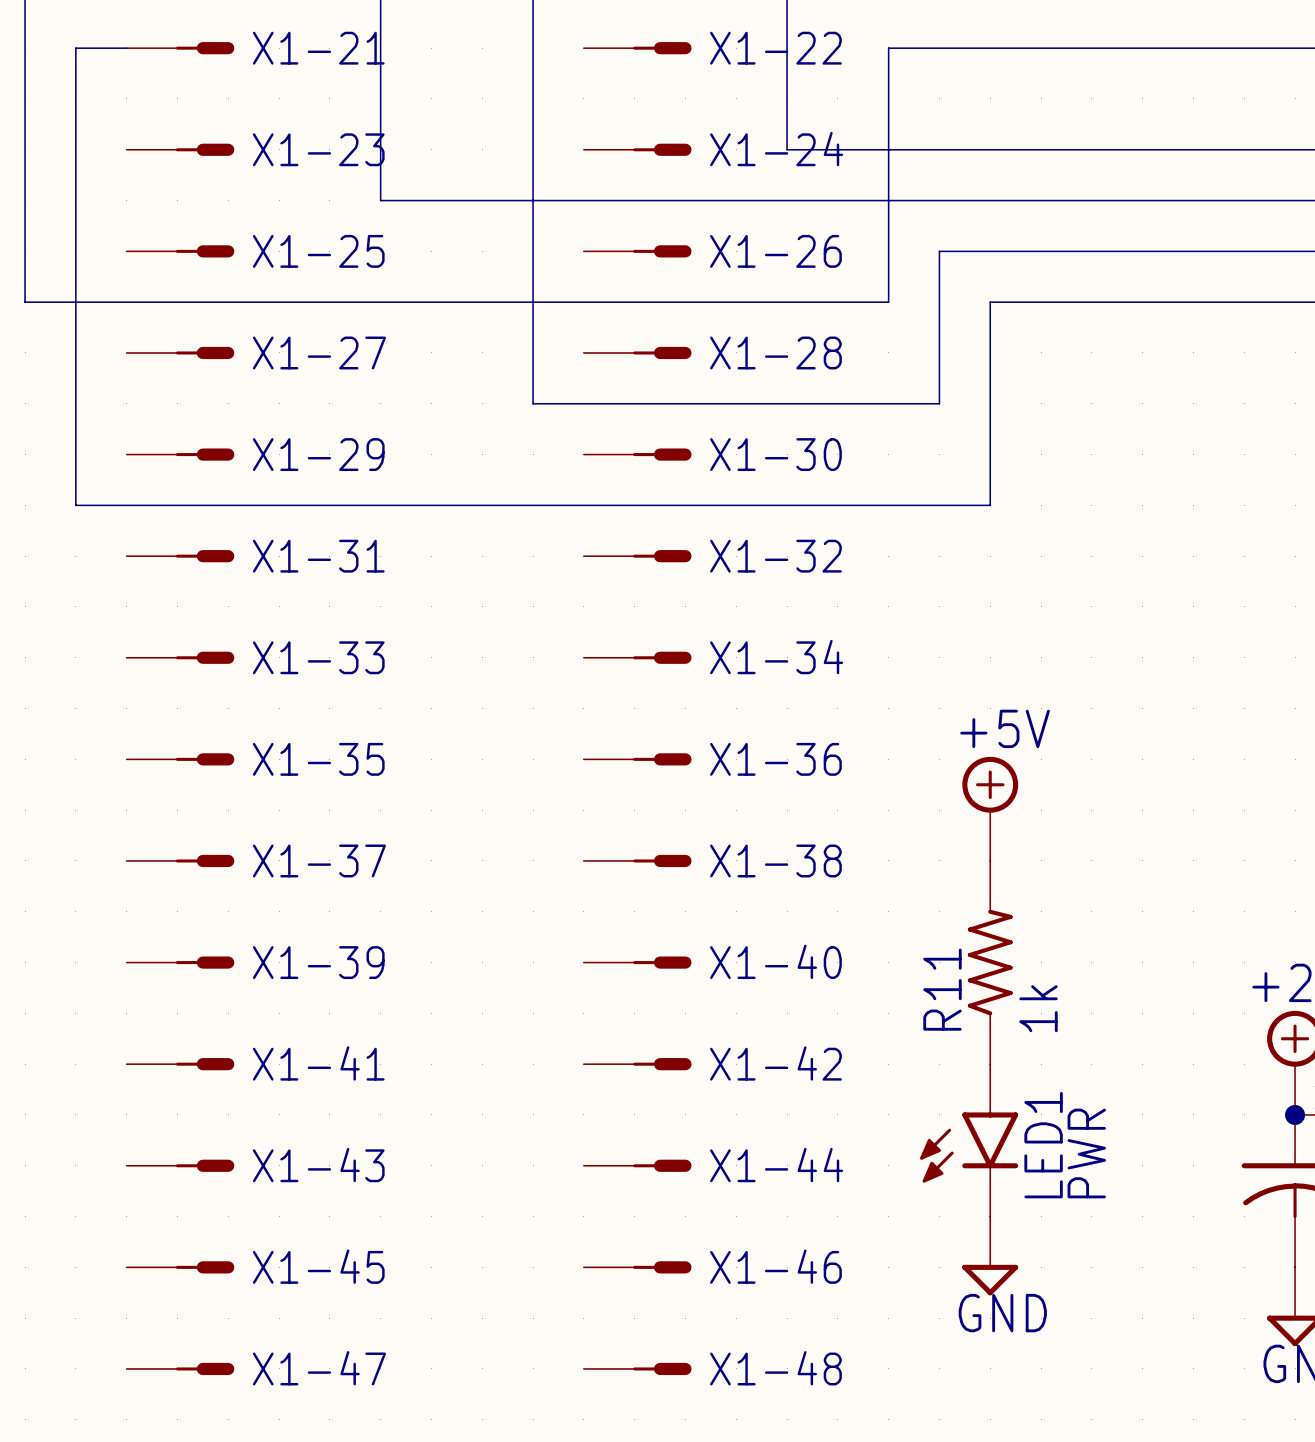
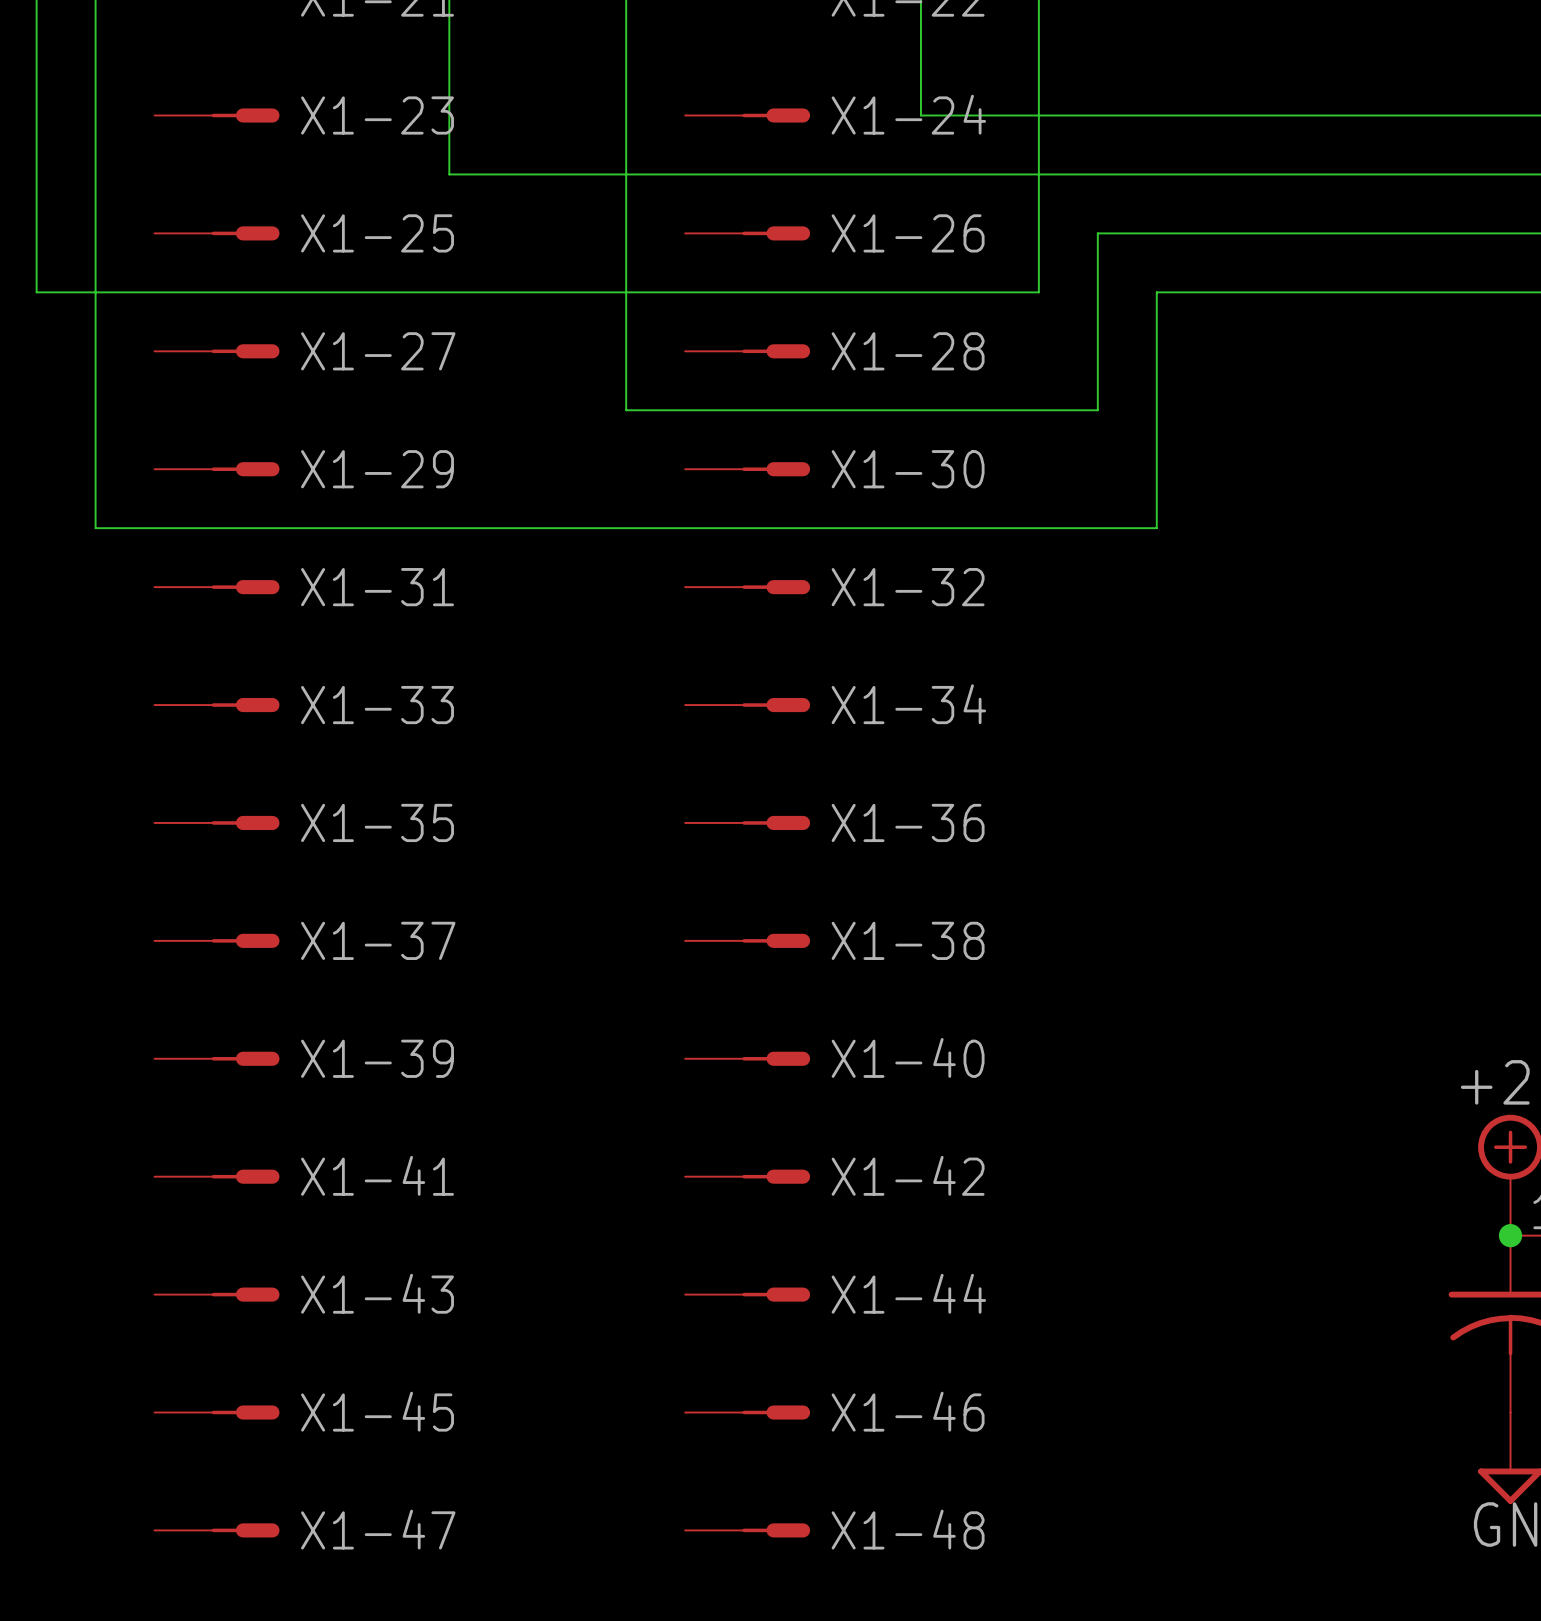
power symbol: +5V (990, 808) -> none
R11: 1k (990, 962) -> none
LED1: PWR (969, 1140) -> none
power symbol: GND (990, 1255) -> none

